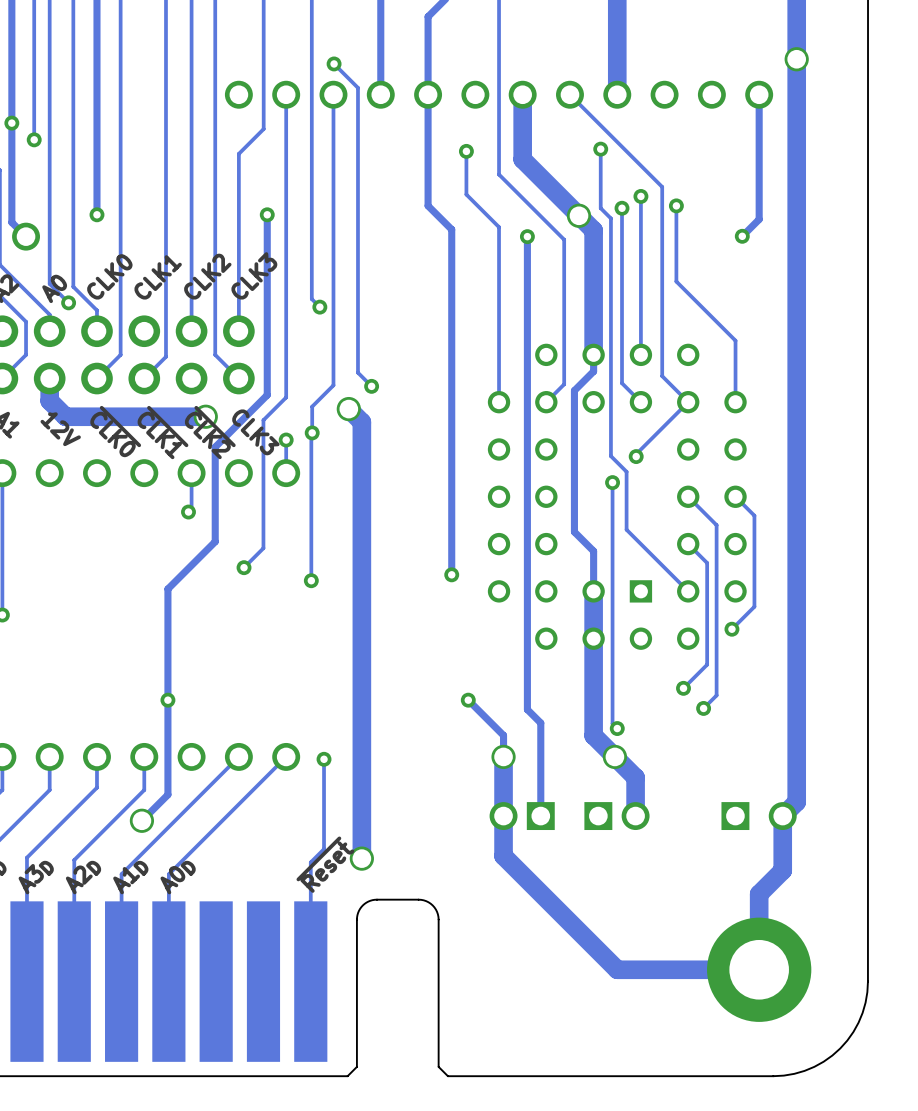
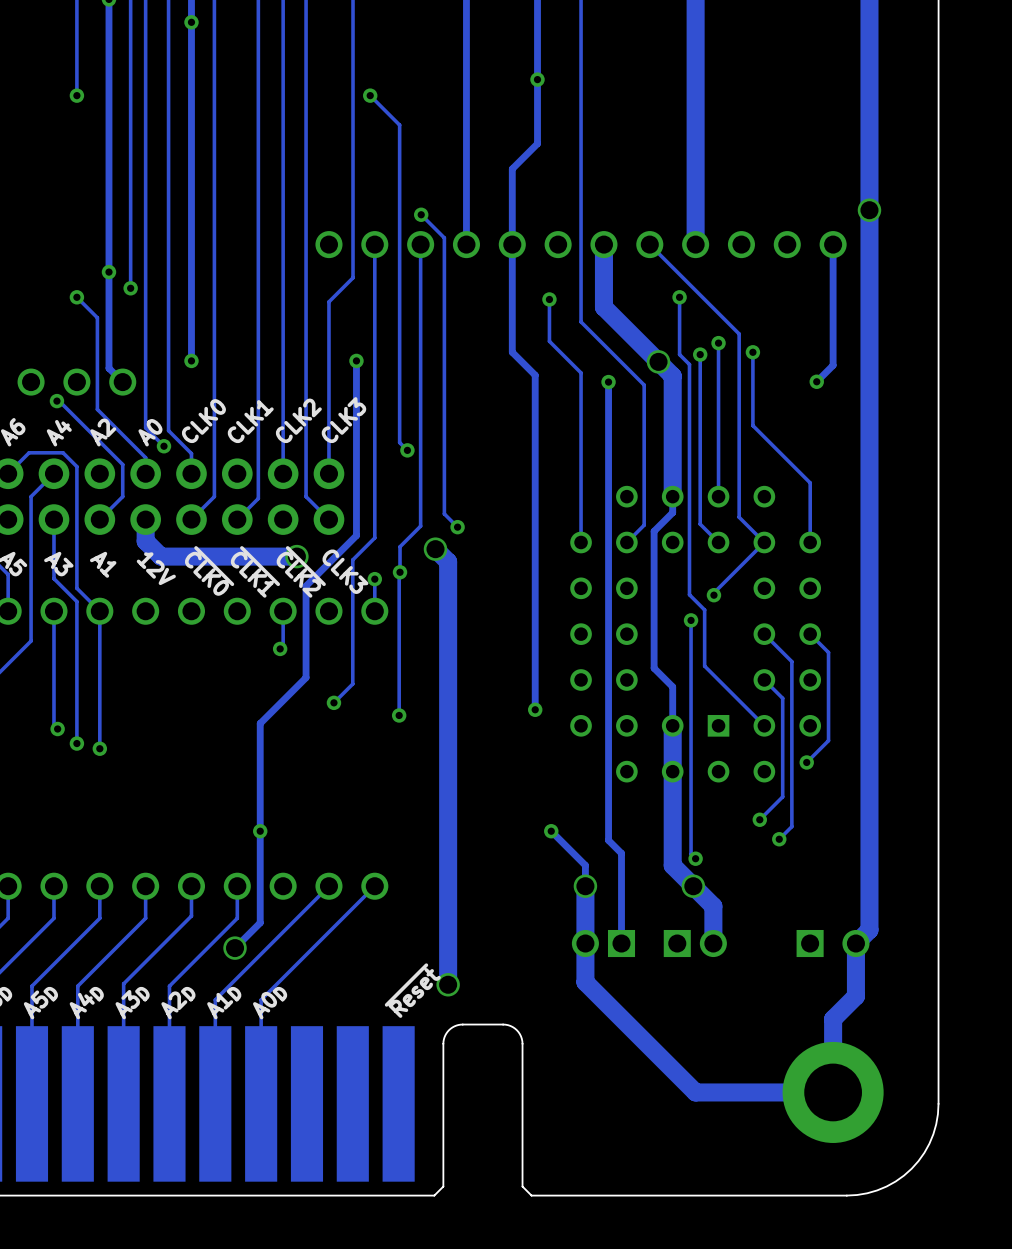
track: (324, 759) (324, 849) (310, 862) (310, 981) -> none
via: (324, 759) -> none

